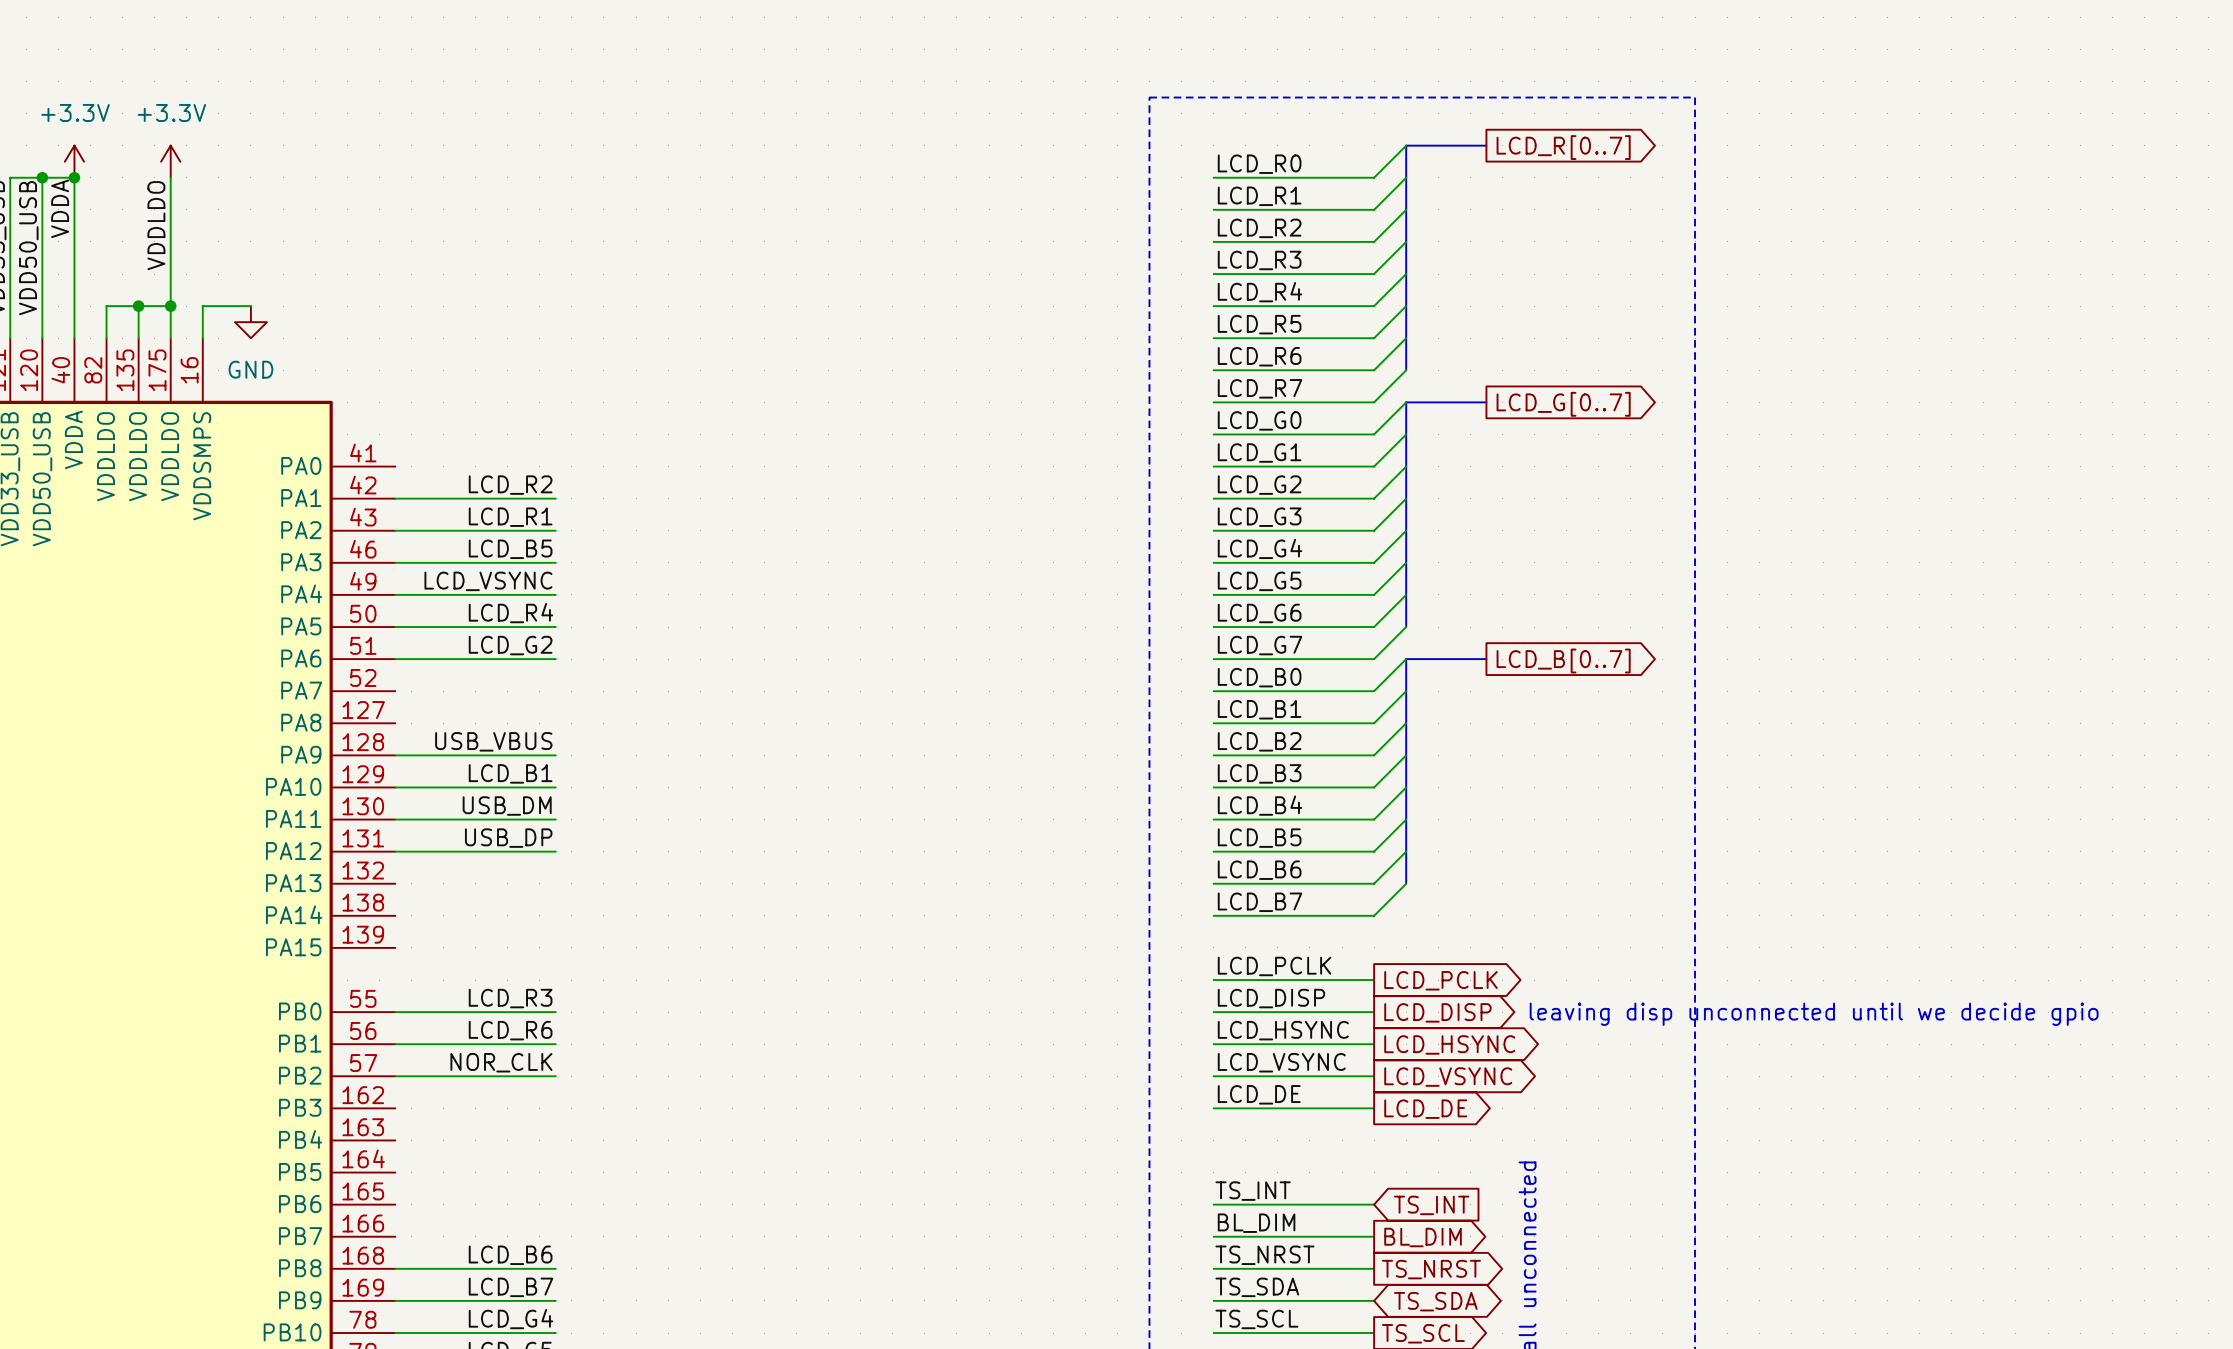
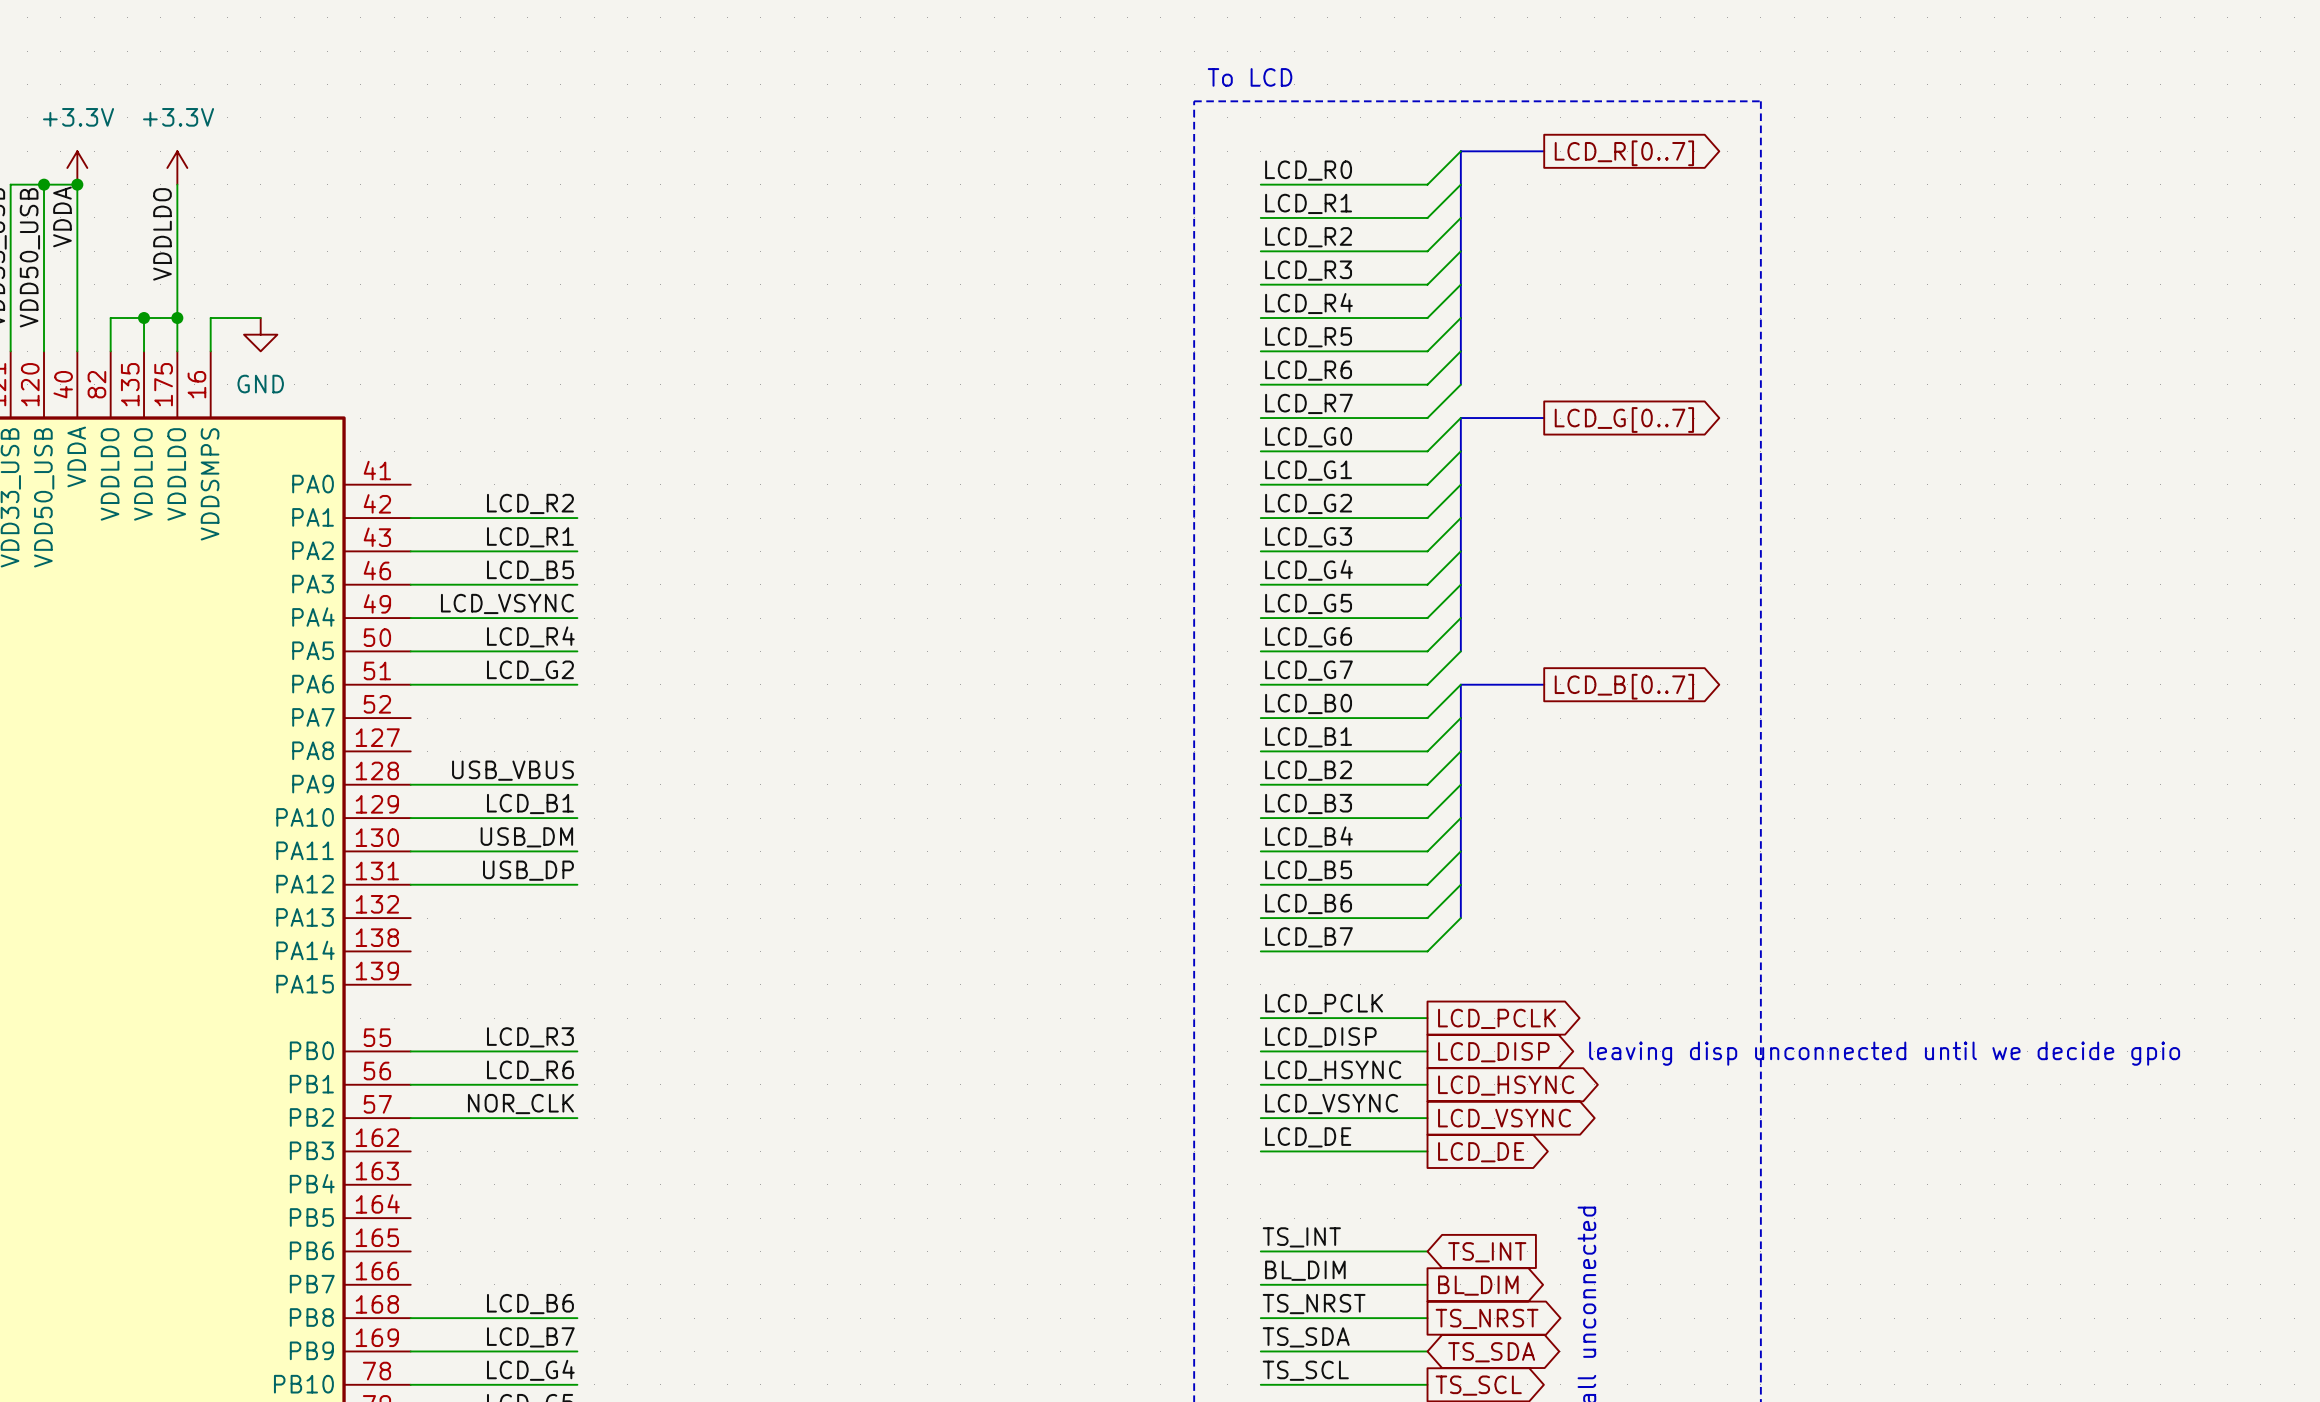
text: none -> To LCD (1250, 77)

